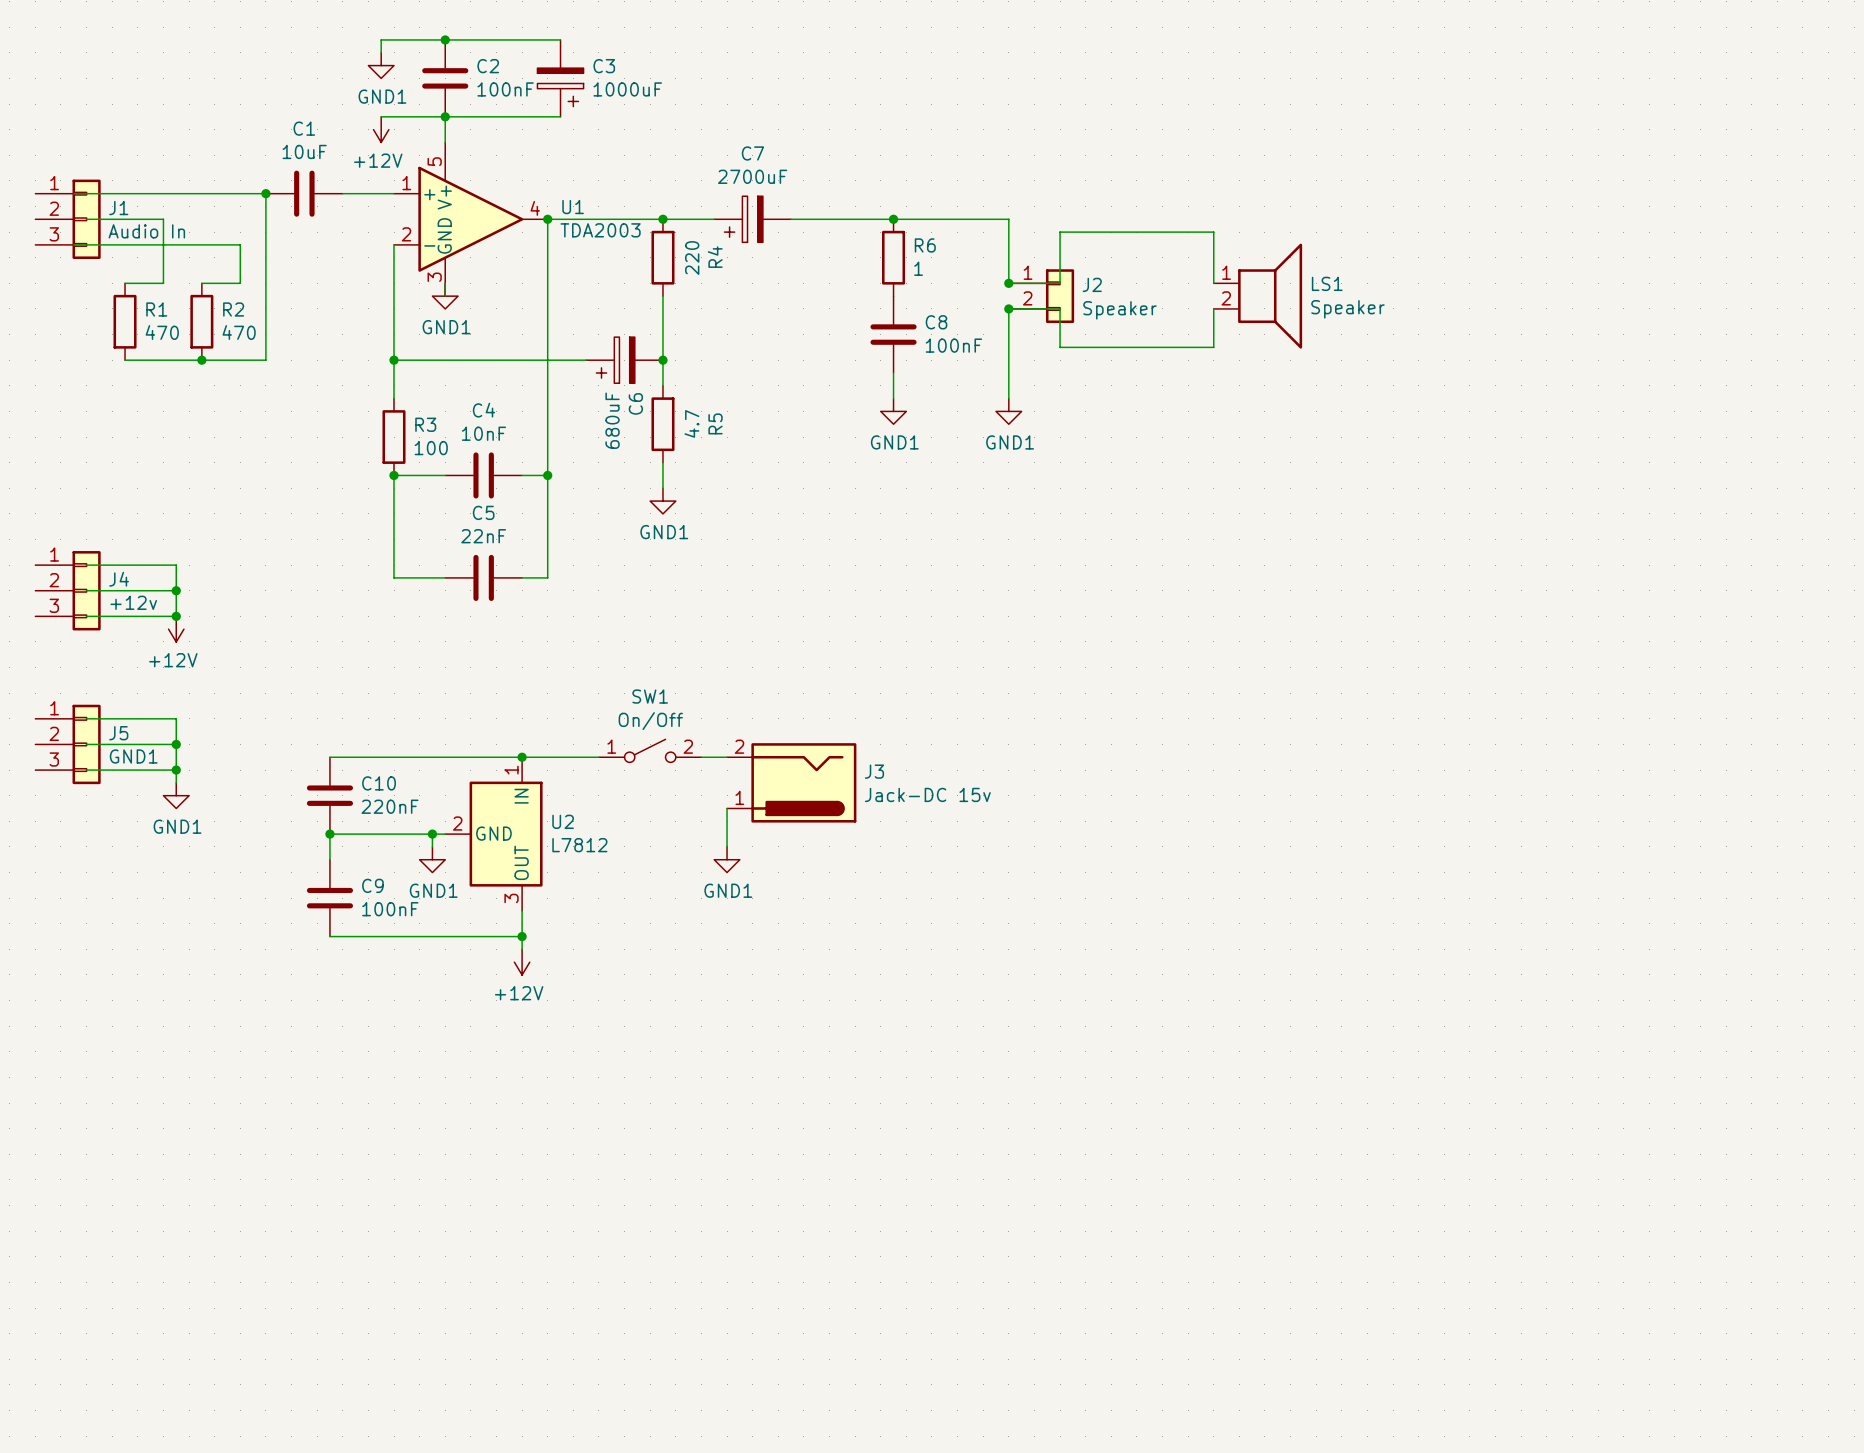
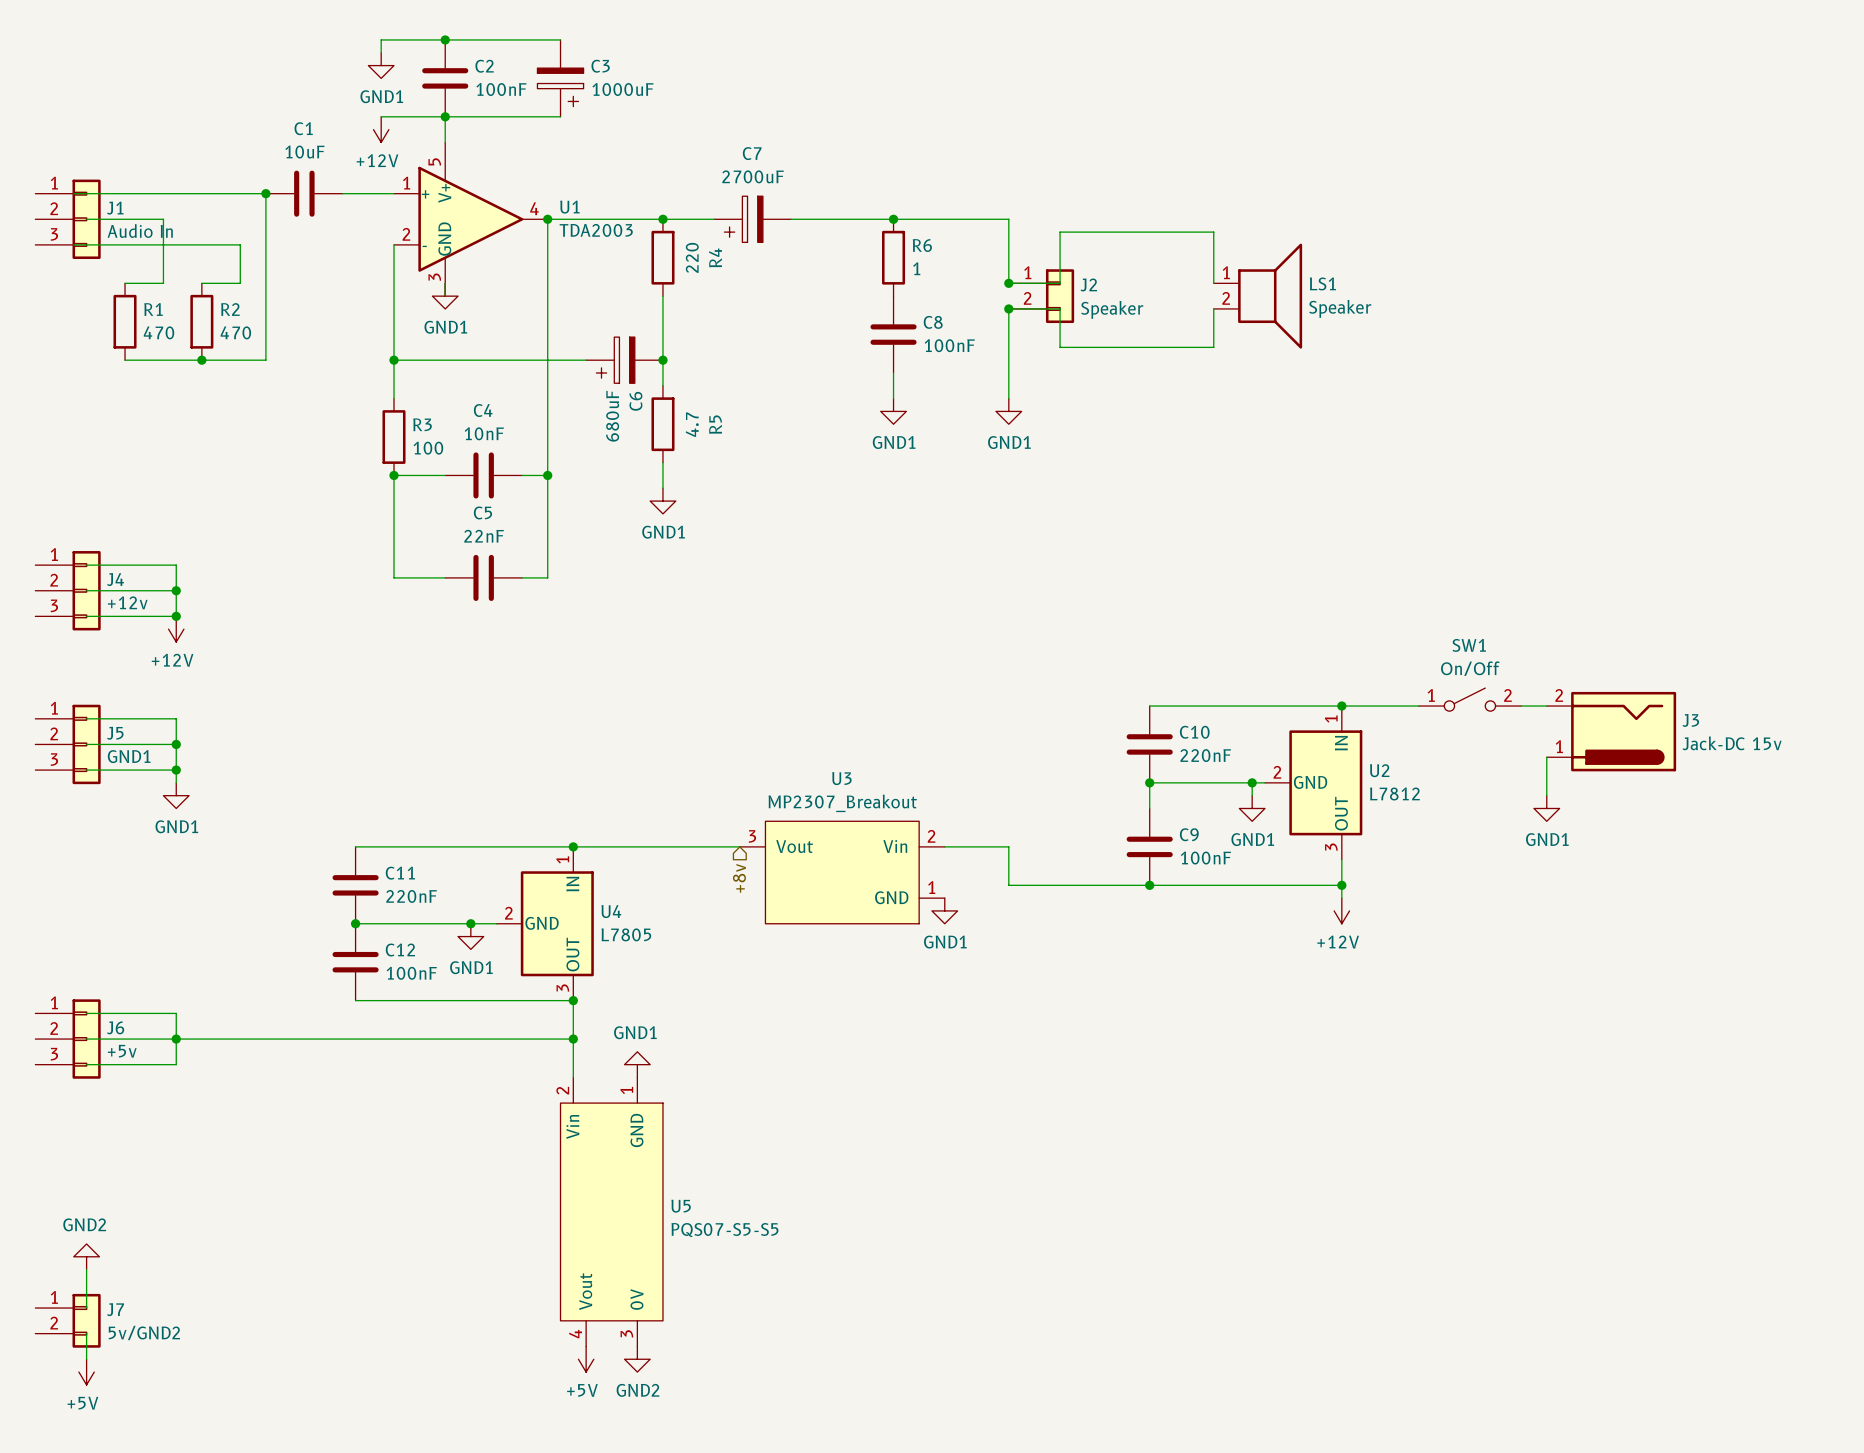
wire: none -> (1149, 706) (1418, 706)
junction: none -> (1341, 706)
wire: none -> (1521, 706) (1546, 706)
SW1 position: (650, 750) -> (1469, 699)
wire: (329, 757) (598, 757) -> none
junction: (522, 757) -> none
wire: (701, 757) (727, 757) -> none
wire: none -> (1546, 757) (1546, 795)
J3 position: (791, 782) -> (1611, 731)
junction: none -> (1149, 782)
wire: none -> (1252, 782) (1252, 795)
junction: none -> (1252, 782)
wire: none -> (1264, 782) (1149, 782) (1149, 808)
C10 position: (329, 795) -> (1149, 744)
wire: (727, 808) (727, 846) -> none
power symbol: none -> GND1 (1252, 808)
power symbol: none -> GND1 (1546, 808)
junction: (329, 834) -> none
wire: (432, 834) (432, 846) -> none
junction: (432, 834) -> none
wire: (445, 834) (329, 834) (329, 859) -> none
U2 position: (493, 834) -> (1313, 782)
wire: none -> (355, 846) (739, 846)
junction: none -> (573, 846)
wire: none -> (944, 846) (1008, 846) (1008, 885) (1341, 885)
power symbol position: GND1 (432, 859) -> GND1 (470, 936)
power symbol: GND1 (727, 859) -> none
wire: none -> (1341, 859) (1341, 898)
U3: none -> MP2307_Breakout (842, 872)
hierarchical label: none -> +8v (739, 878)
C11: none -> 220nF (355, 885)
junction: none -> (1149, 885)
junction: none -> (1341, 885)
C9 position: (329, 898) -> (1149, 846)
power symbol: none -> GND1 (944, 910)
power symbol: none -> +12V (1341, 910)
wire: none -> (355, 923) (496, 923)
junction: none -> (355, 923)
junction: none -> (470, 923)
U4: none -> L7805 (545, 923)
wire: (329, 936) (522, 936) -> none
junction: (522, 936) -> none
C12: none -> 100nF (355, 962)
power symbol: +12V (522, 962) -> none
wire: none -> (355, 1000) (573, 1000) (573, 1077)
junction: none -> (573, 1000)
wire: none -> (86, 1013) (176, 1013) (176, 1064) (86, 1064)
J6: none -> +5v (68, 1039)
wire: none -> (86, 1039) (573, 1039)
junction: none -> (176, 1039)
junction: none -> (573, 1039)
power symbol: none -> GND1 (637, 1064)
U5: none -> PQS07-S5-S5 (611, 1211)
power symbol: none -> GND2 (86, 1256)
wire: none -> (86, 1269) (86, 1308)
J7: none -> 5v/GND2 (68, 1320)
wire: none -> (86, 1333) (86, 1359)
power symbol: none -> +5V (586, 1359)
power symbol: none -> GND2 (637, 1359)
power symbol: none -> +5V (86, 1372)

